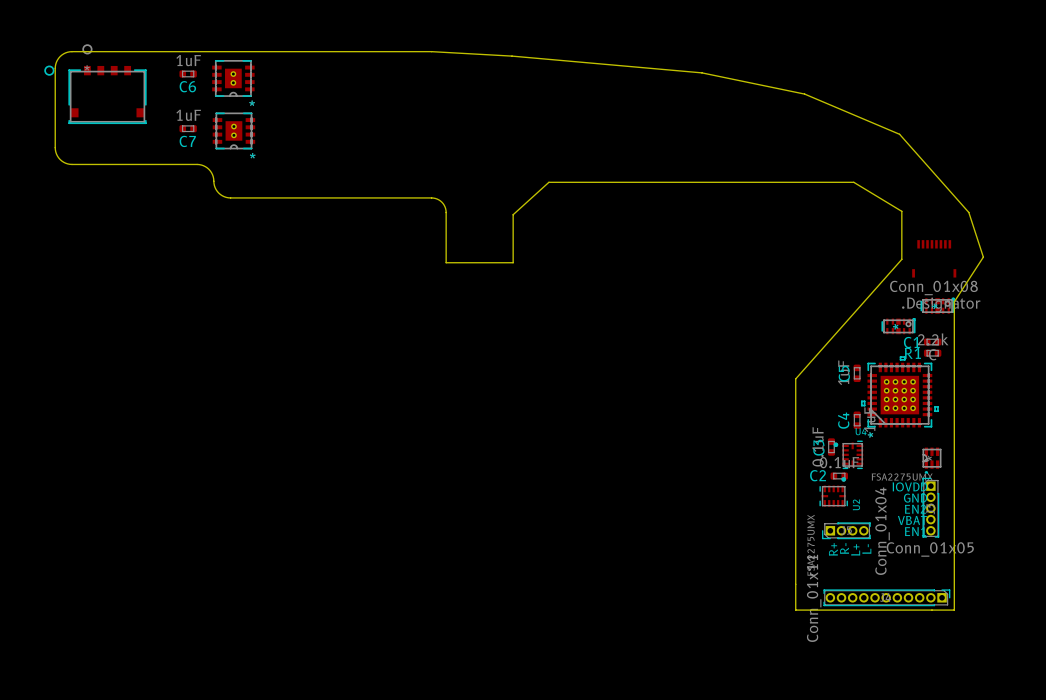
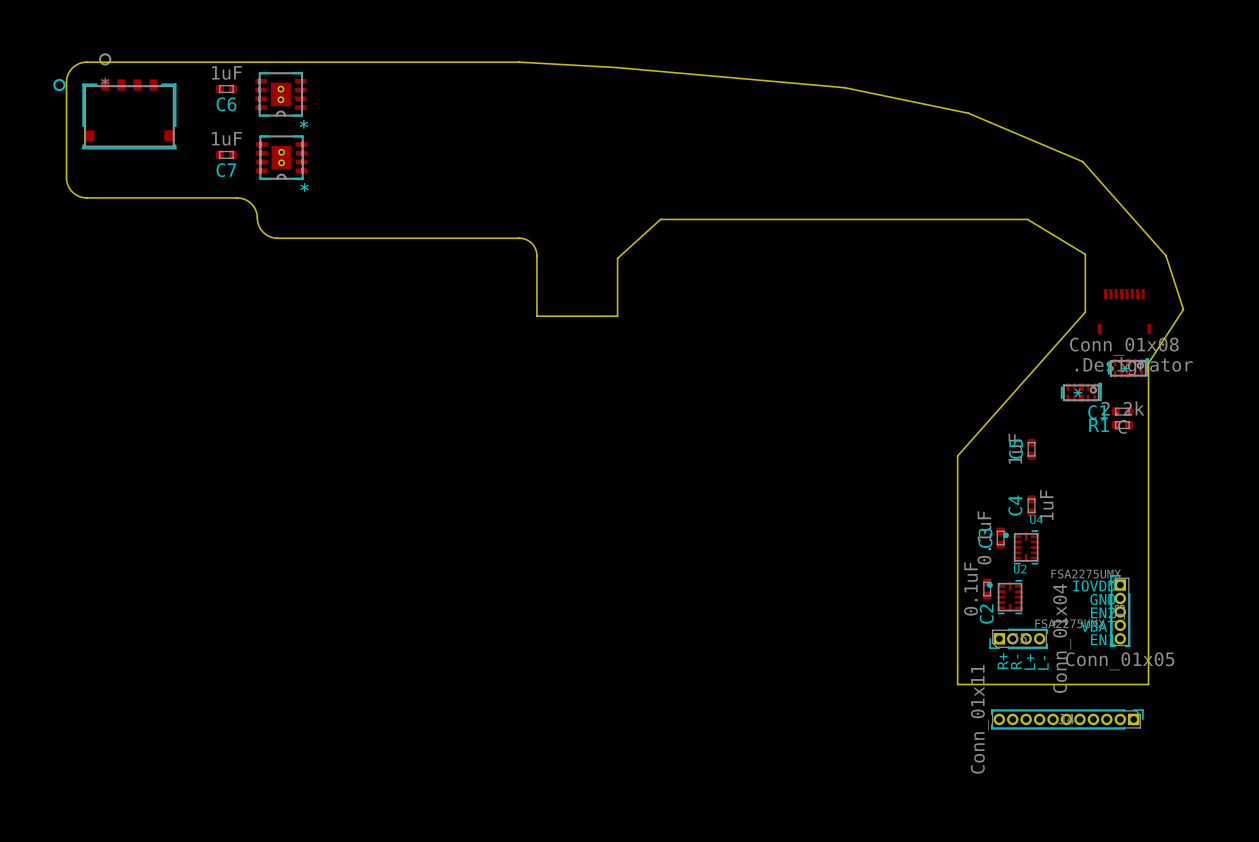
part: (899, 391) -> none
part: (931, 460) -> none
C2 name position: C2 (818, 475) -> C2 (986, 614)
C2 rotation: 0° (839, 476) -> 90° clockwise (987, 589)
C2 position: (839, 476) -> (987, 589)
U2 rotation: 0° (833, 491) -> 90° counterclockwise (1005, 597)
board edge: (795, 568) (795, 610) (954, 610) (954, 568) -> (957, 684) (1148, 684)

